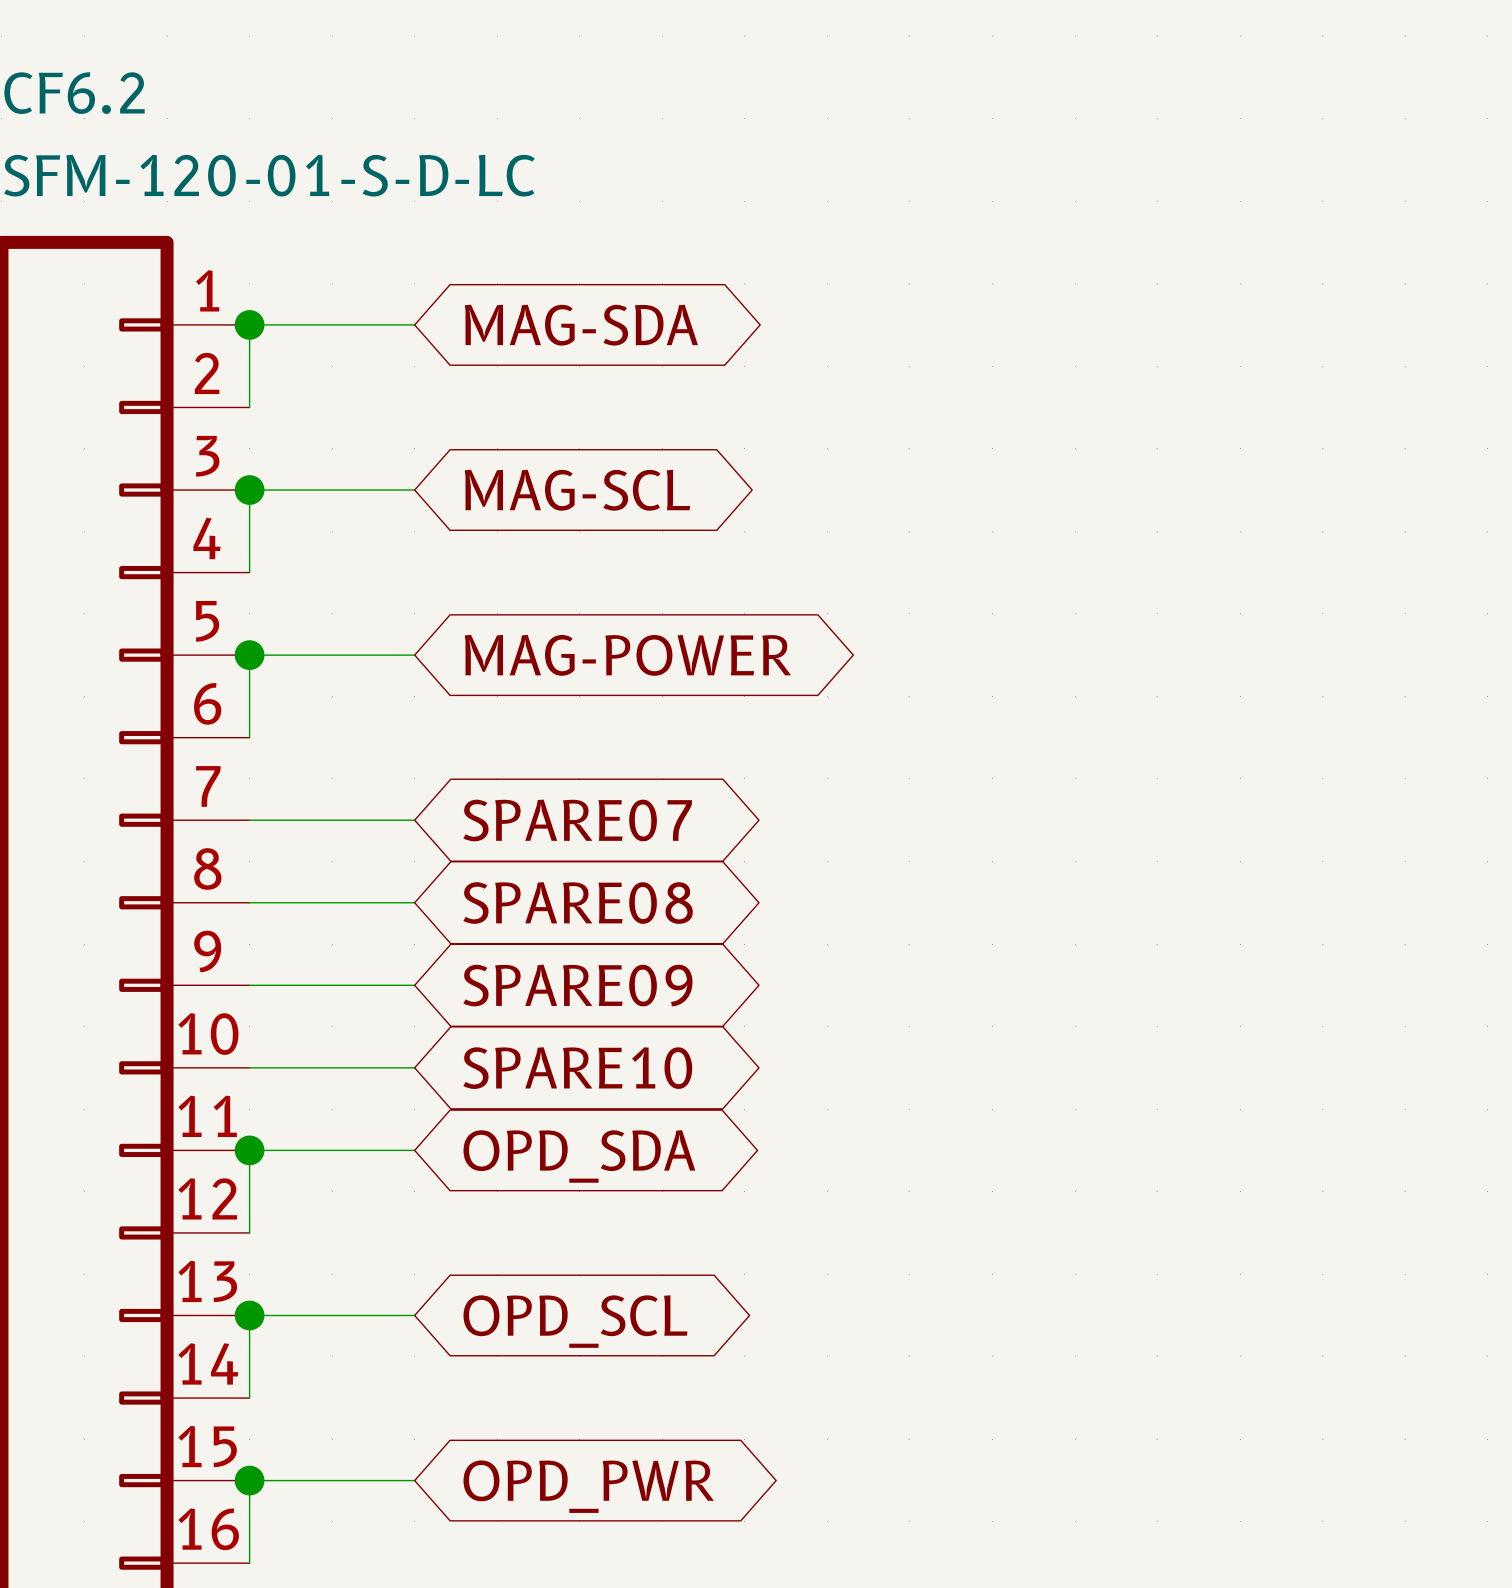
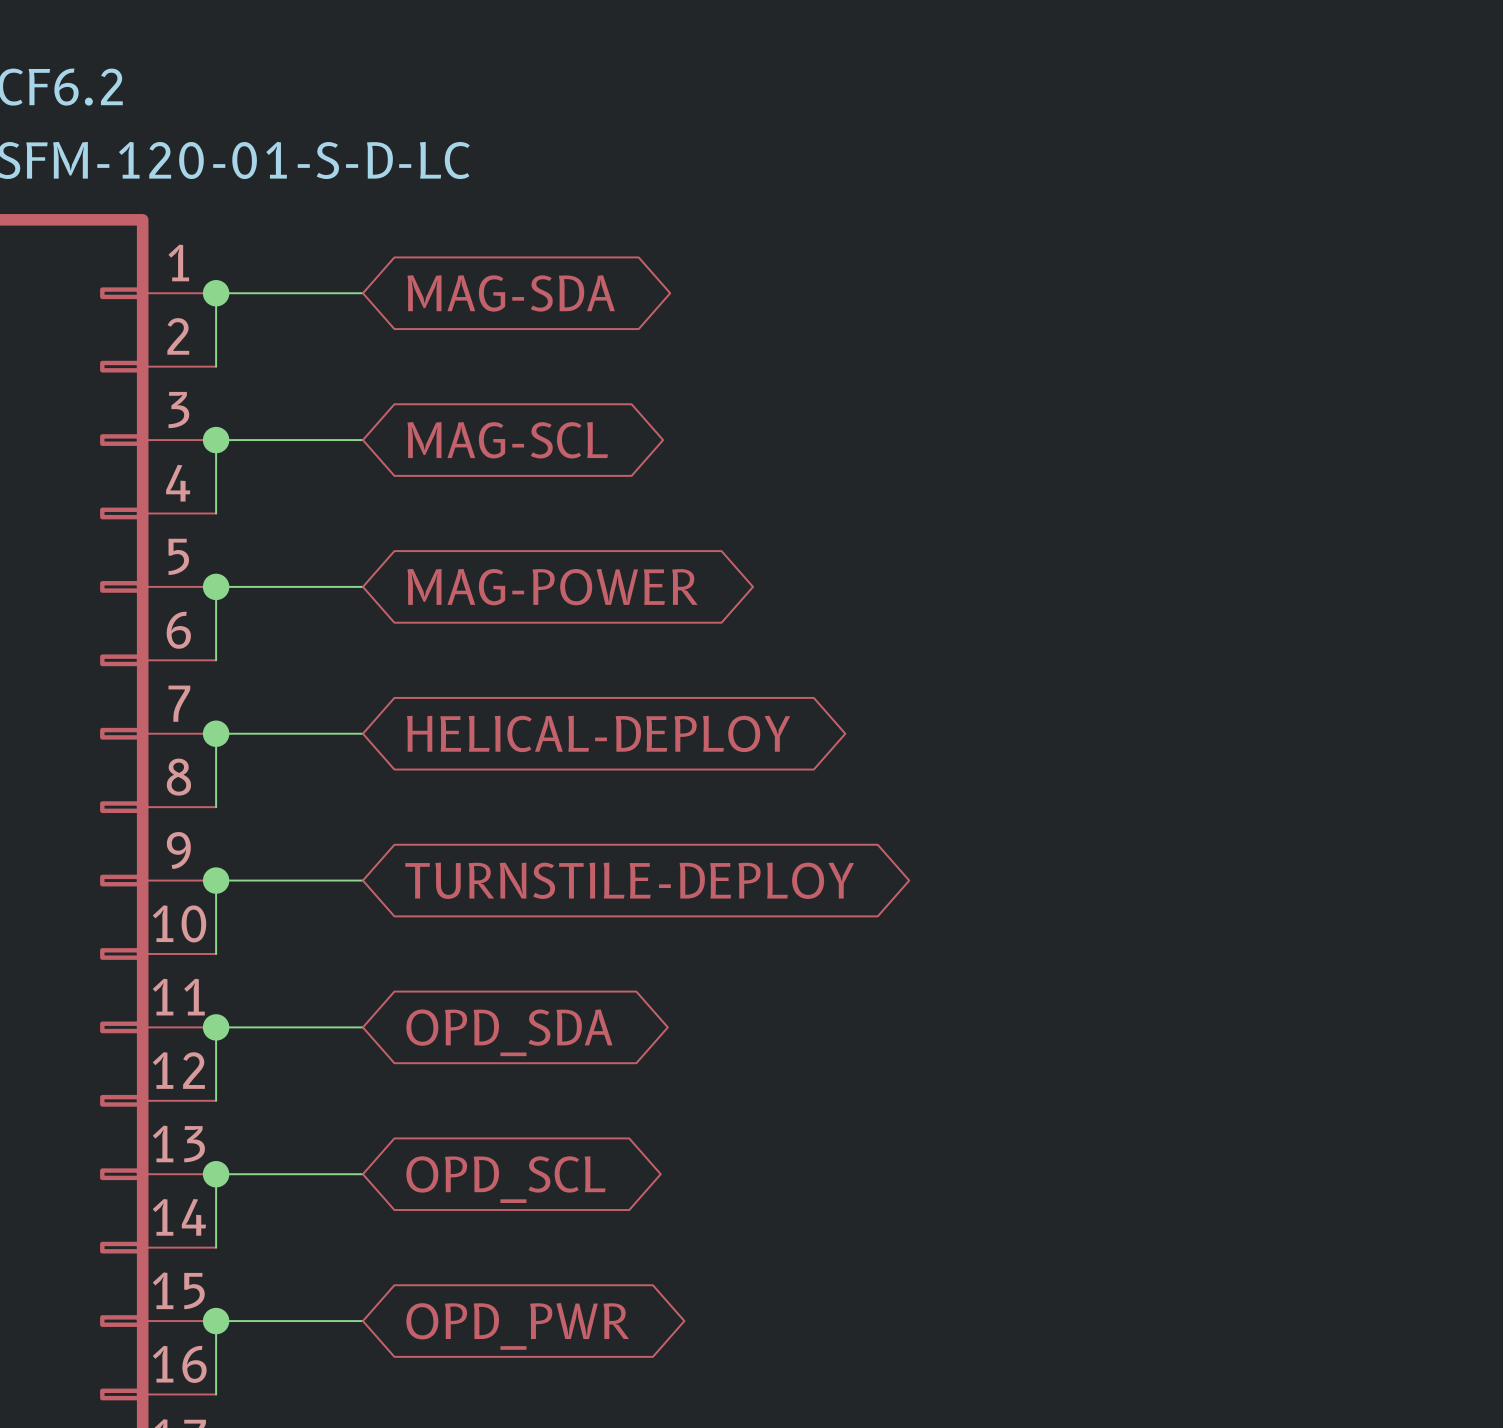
junction: none -> (216, 733)
global label: SPARE07 (577, 820) -> HELICAL-DEPLOY (598, 733)
wire: (249, 902) (414, 902) -> (216, 807) (216, 733)
global label: SPARE08 (578, 902) -> none
junction: none -> (216, 880)
global label: SPARE09 (577, 985) -> TURNSTILE-DEPLOY (629, 880)
wire: (249, 1067) (414, 1067) -> (216, 953) (216, 880)
global label: SPARE10 (577, 1068) -> none

